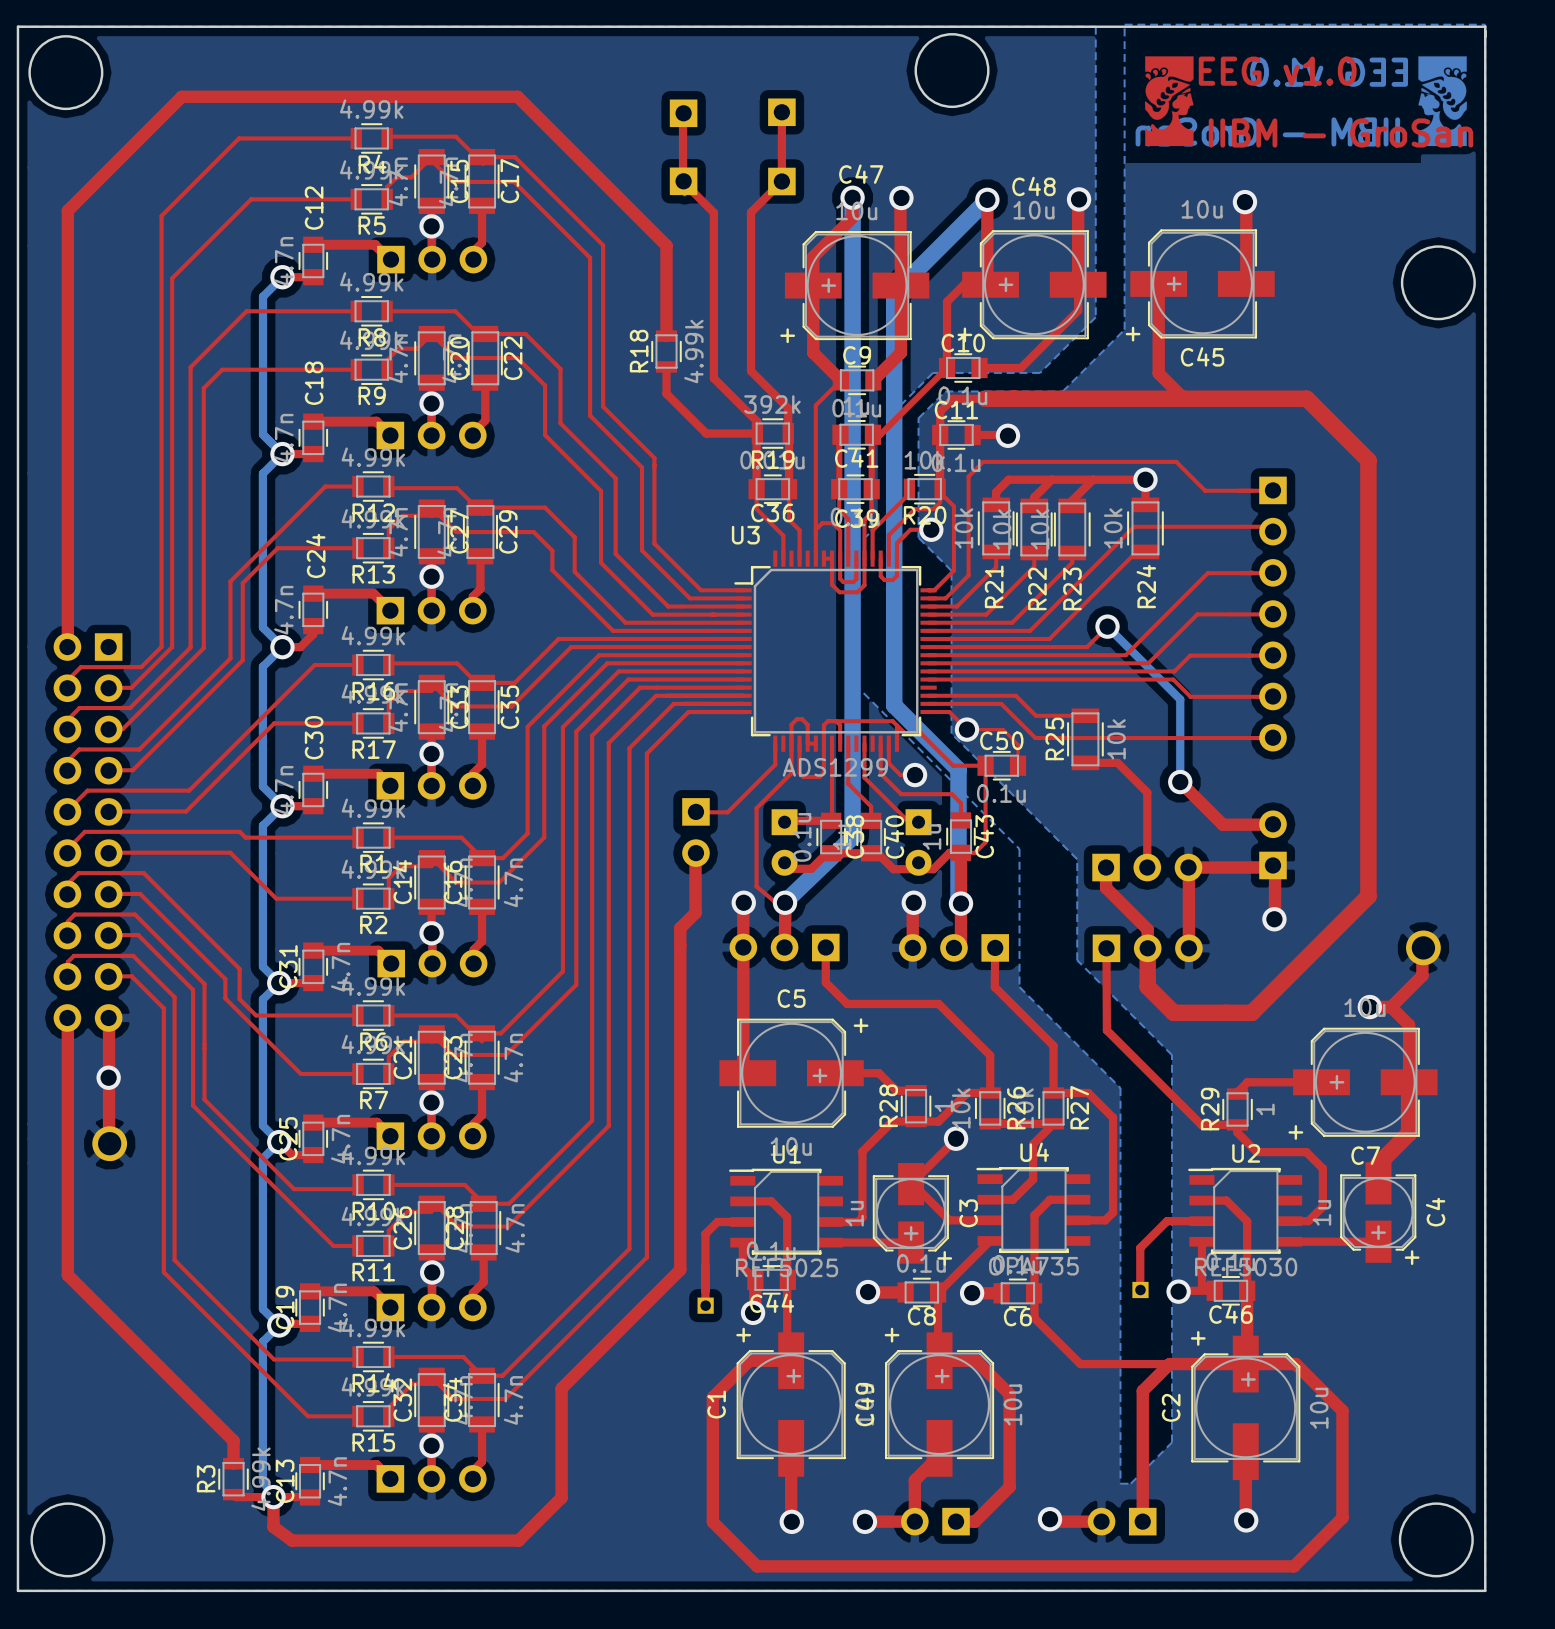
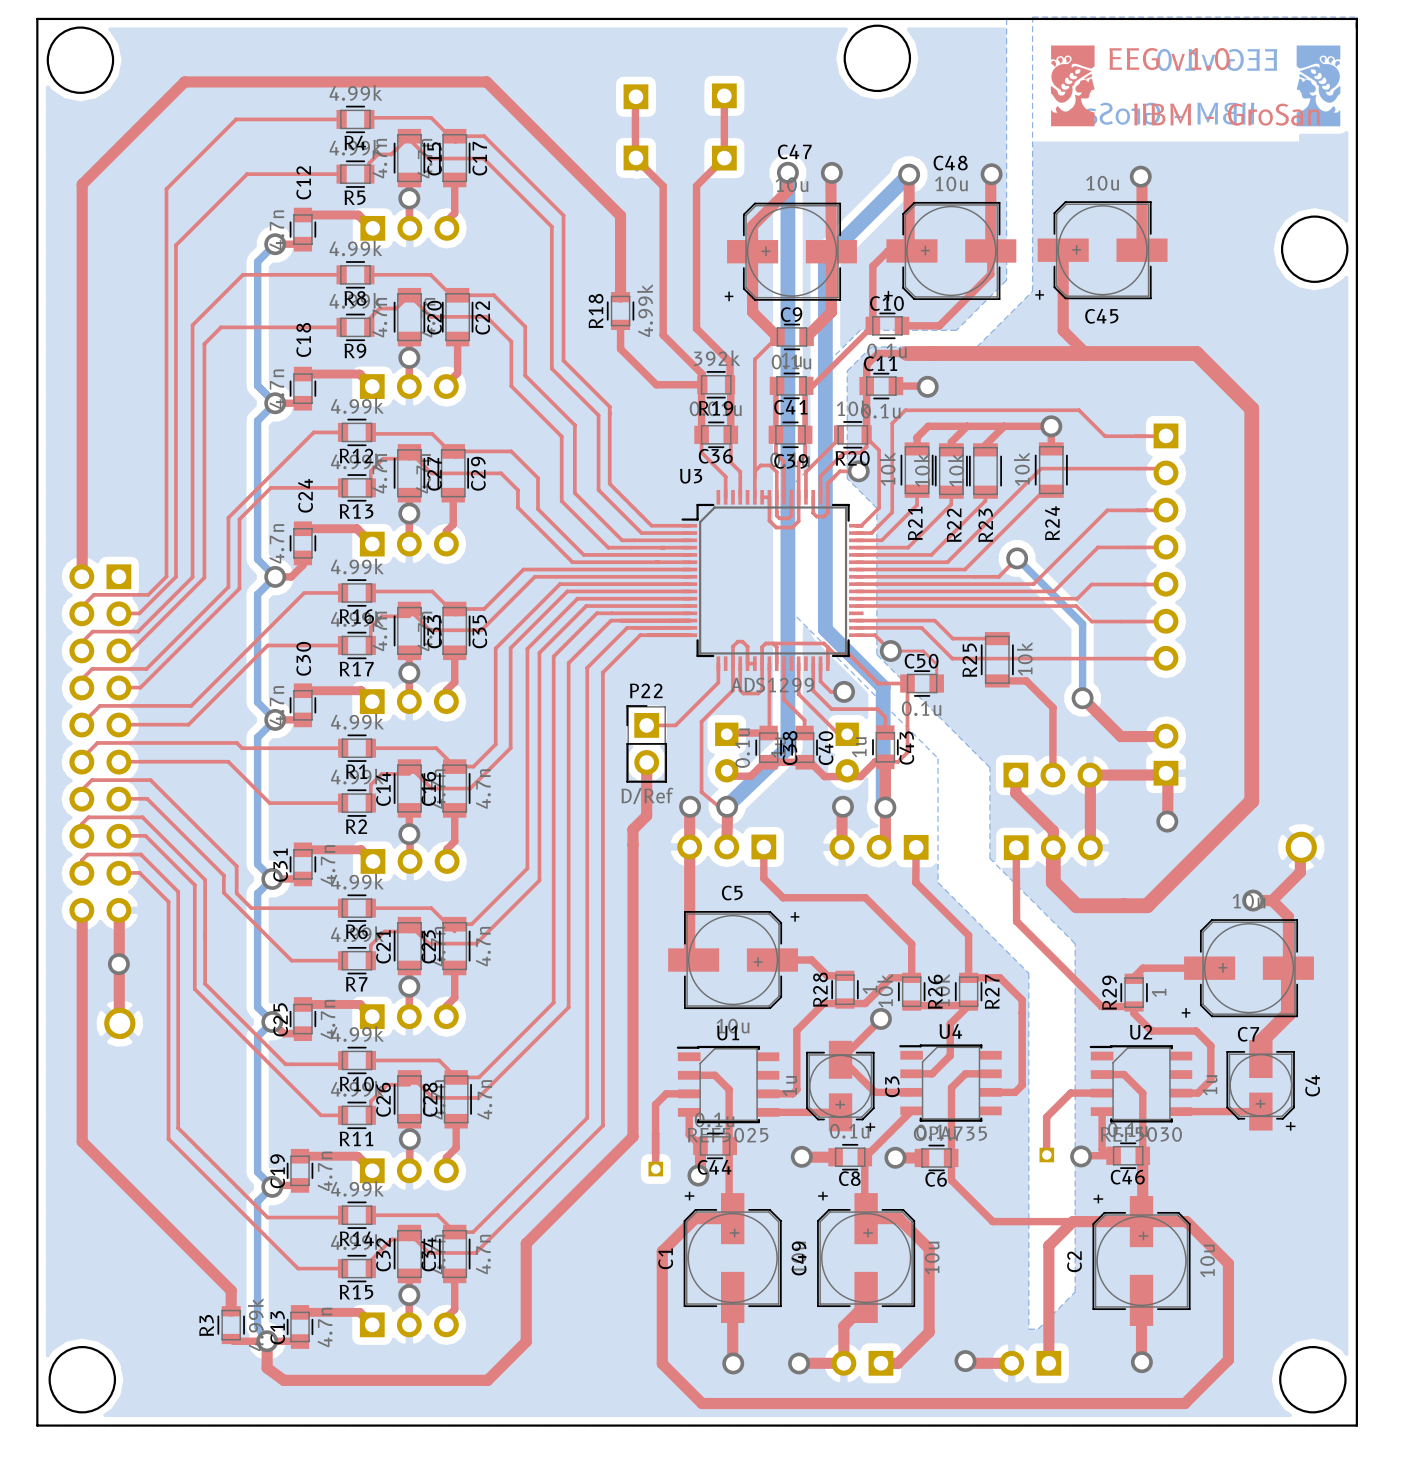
P22 side: bottom (695, 832) -> top (646, 743)

